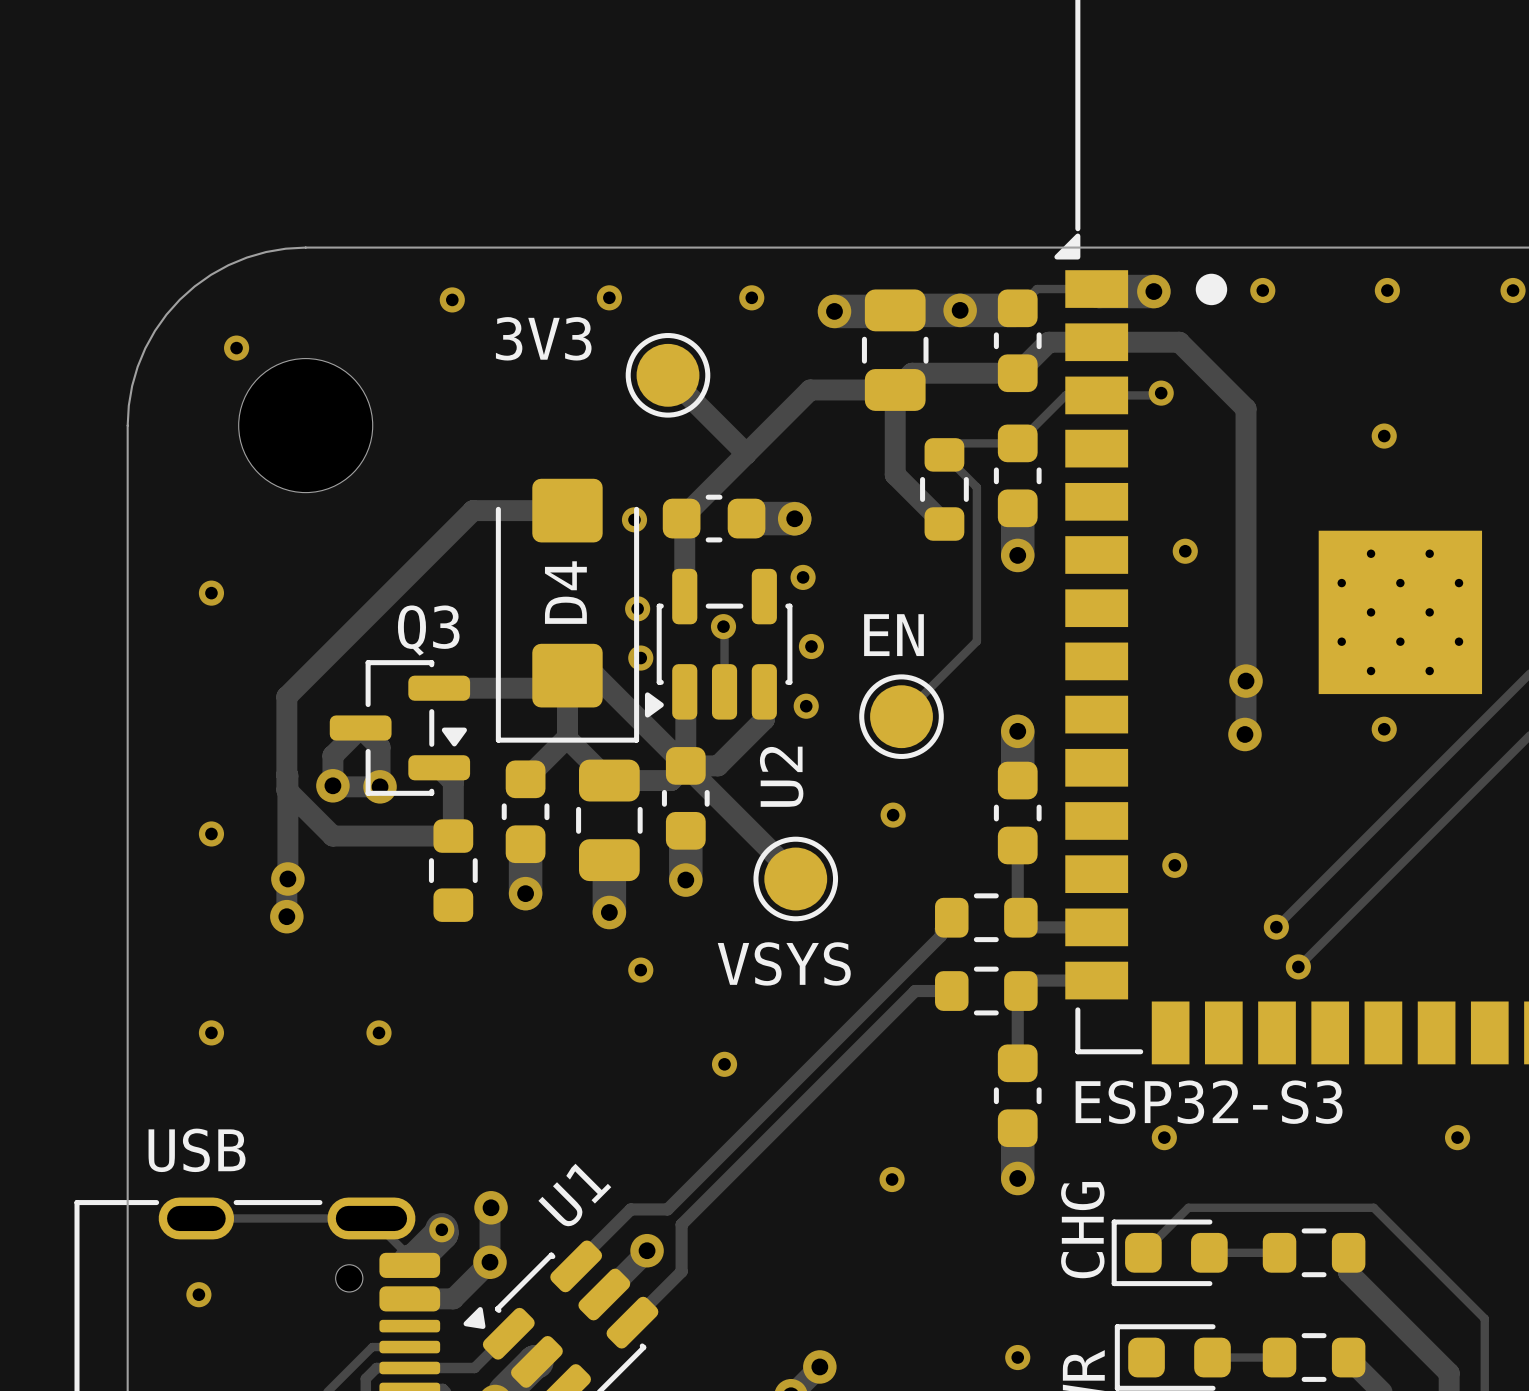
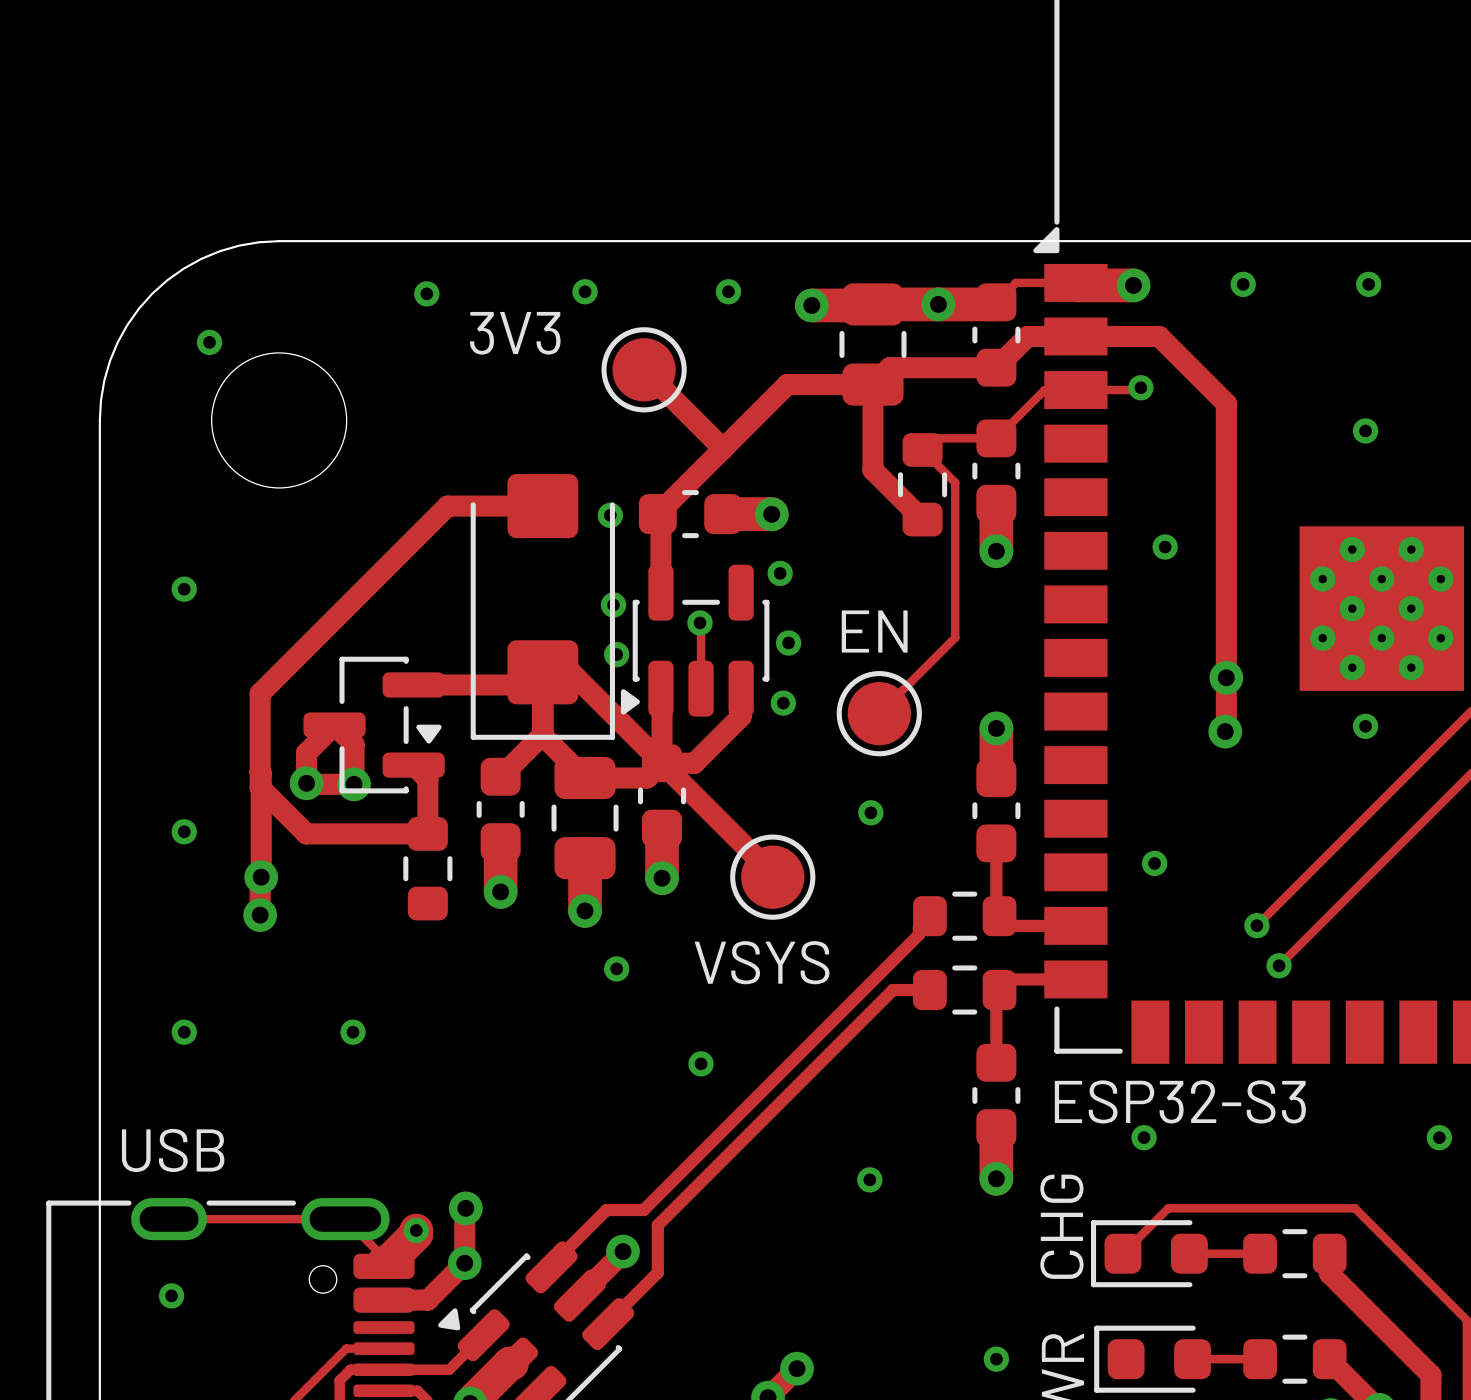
drawing: [1195, 273, 1228, 306] -> none
D4 name: D4 (565, 592) -> none
Q3 name: Q3 (428, 630) -> none
U2 name: U2 (781, 776) -> none
U1 name: U1 (574, 1195) -> none

